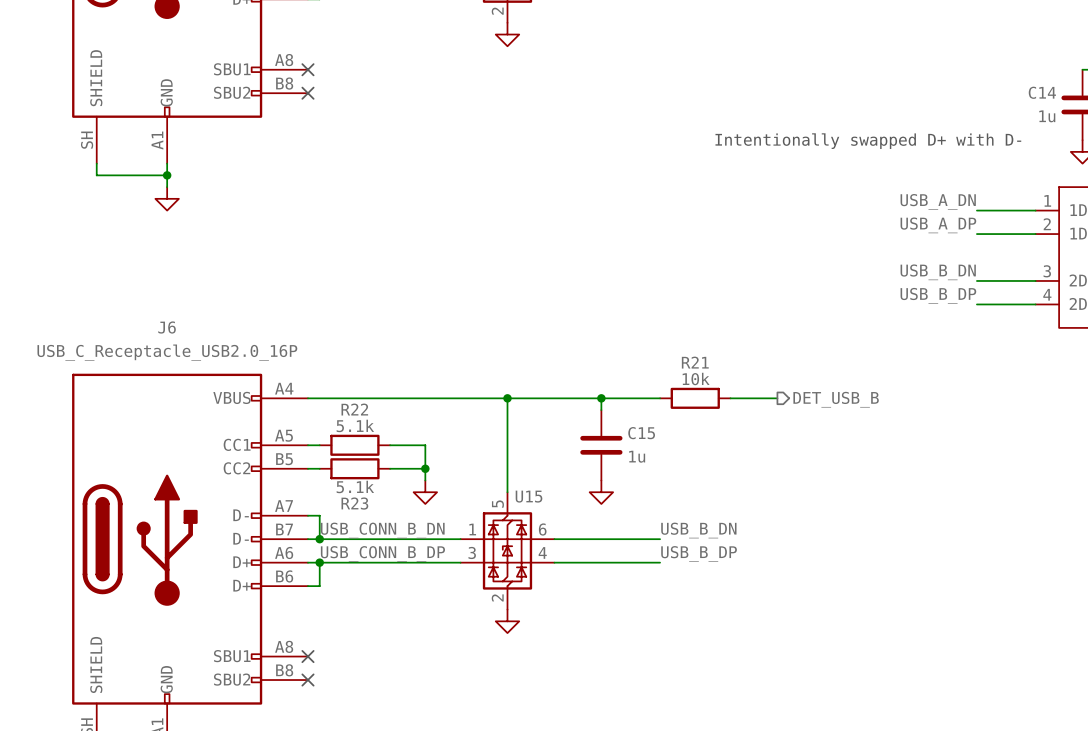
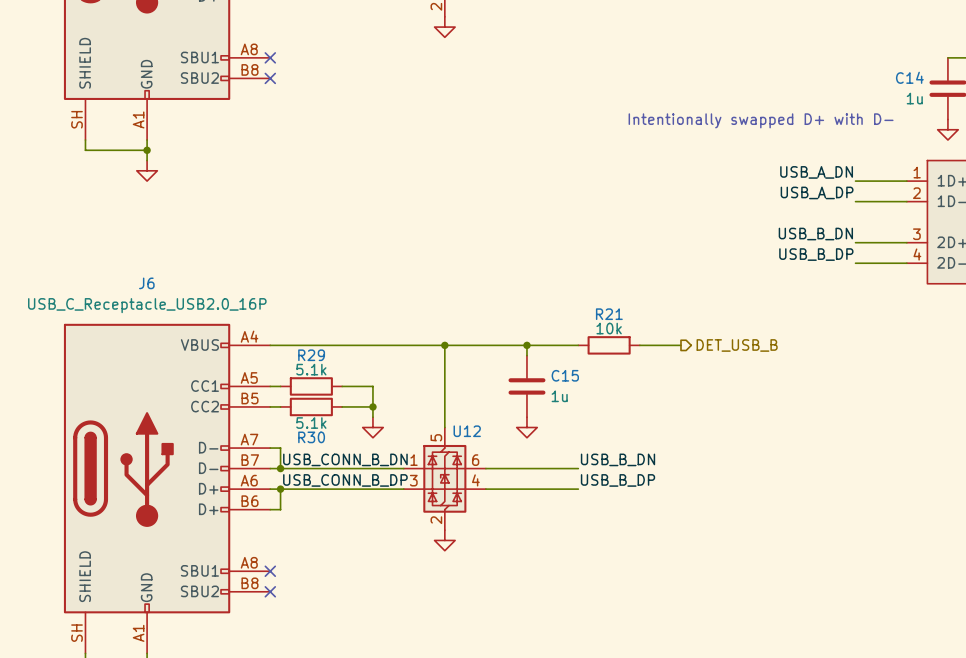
R22 name: R22 (354, 409) -> R29 (311, 355)
U15 name: U15 (529, 496) -> U12 (467, 431)
R23 name: R23 (354, 503) -> R30 (311, 437)

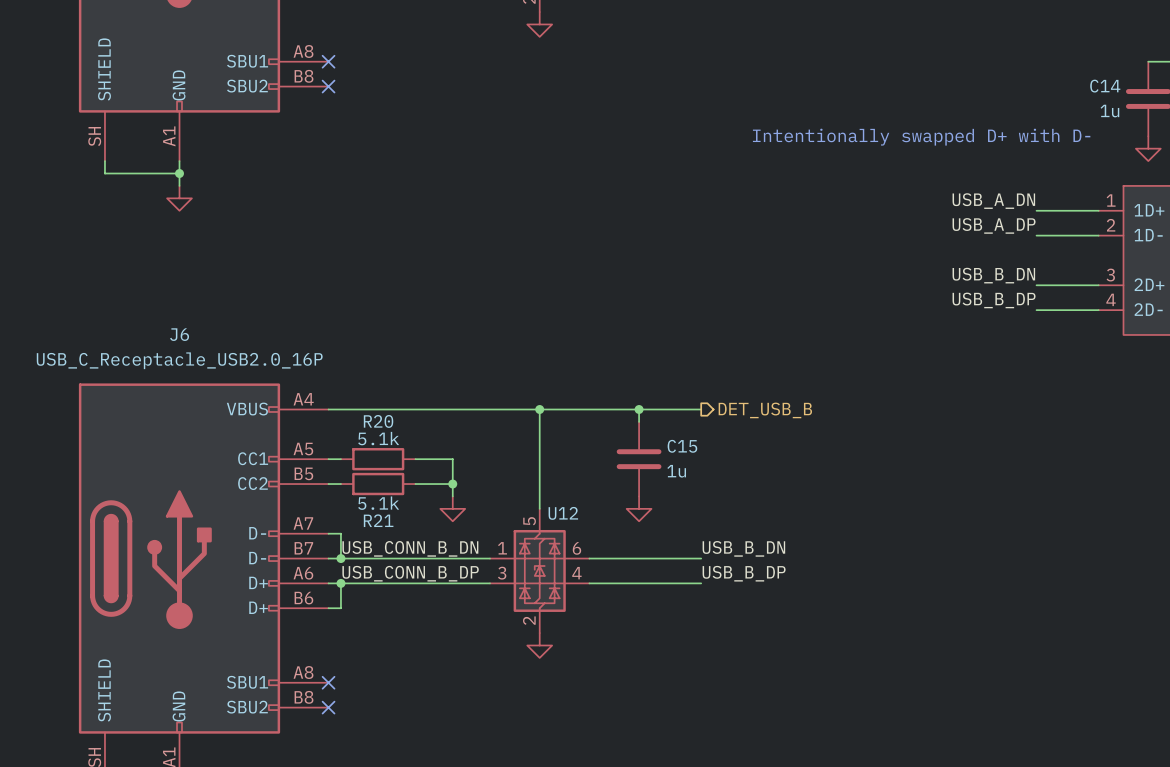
R21: 10k (609, 345) -> none
wire: (639, 345) (680, 345) -> none
hierarchical label position: DET_USB_B (737, 345) -> DET_USB_B (765, 410)
R29 name: R29 (311, 355) -> R20 (378, 421)
R30 name: R30 (311, 437) -> R21 (378, 520)

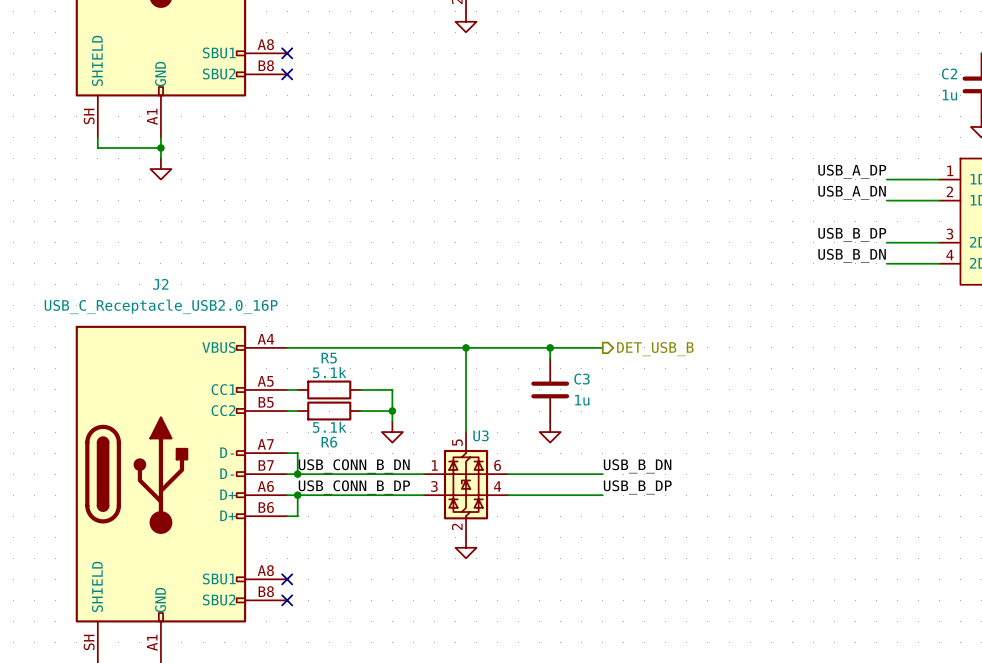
C14 name: C14 (1105, 86) -> C2 (949, 73)
text: Intentionally swapped D+ with D- (921, 137) -> none
label: USB_A_DN (993, 201) -> USB_A_DP (852, 171)
label: USB_A_DP (994, 225) -> USB_A_DN (852, 192)
label: USB_B_DN (993, 275) -> USB_B_DP (852, 234)
label: USB_B_DP (994, 300) -> USB_B_DN (852, 255)
J6 name: J6 (179, 334) -> J2 (160, 284)
R20 name: R20 (378, 421) -> R5 (329, 358)
C15 name: C15 (682, 446) -> C3 (581, 379)
U12 name: U12 (563, 513) -> U3 (481, 435)
R21 name: R21 (378, 520) -> R6 (329, 442)

